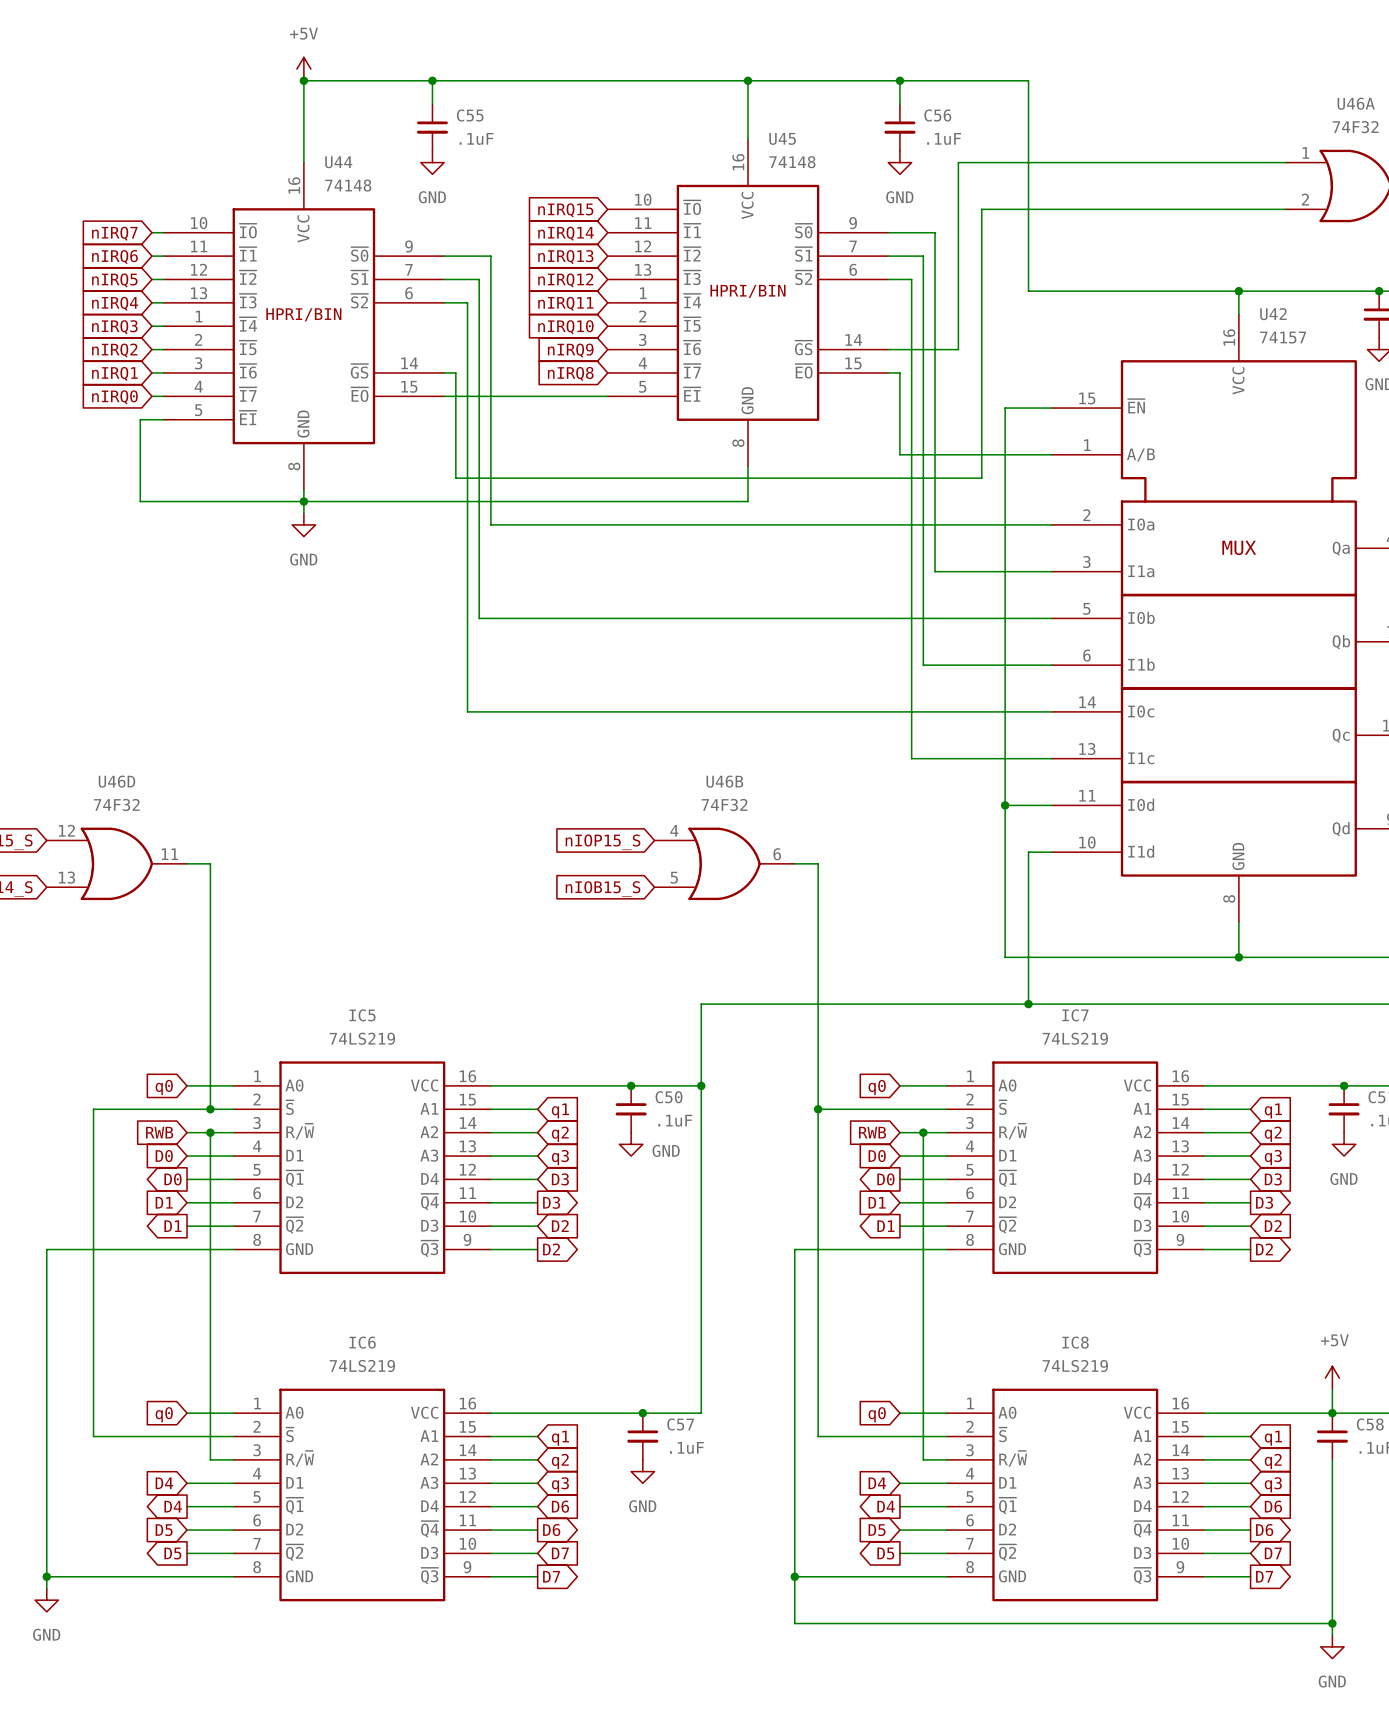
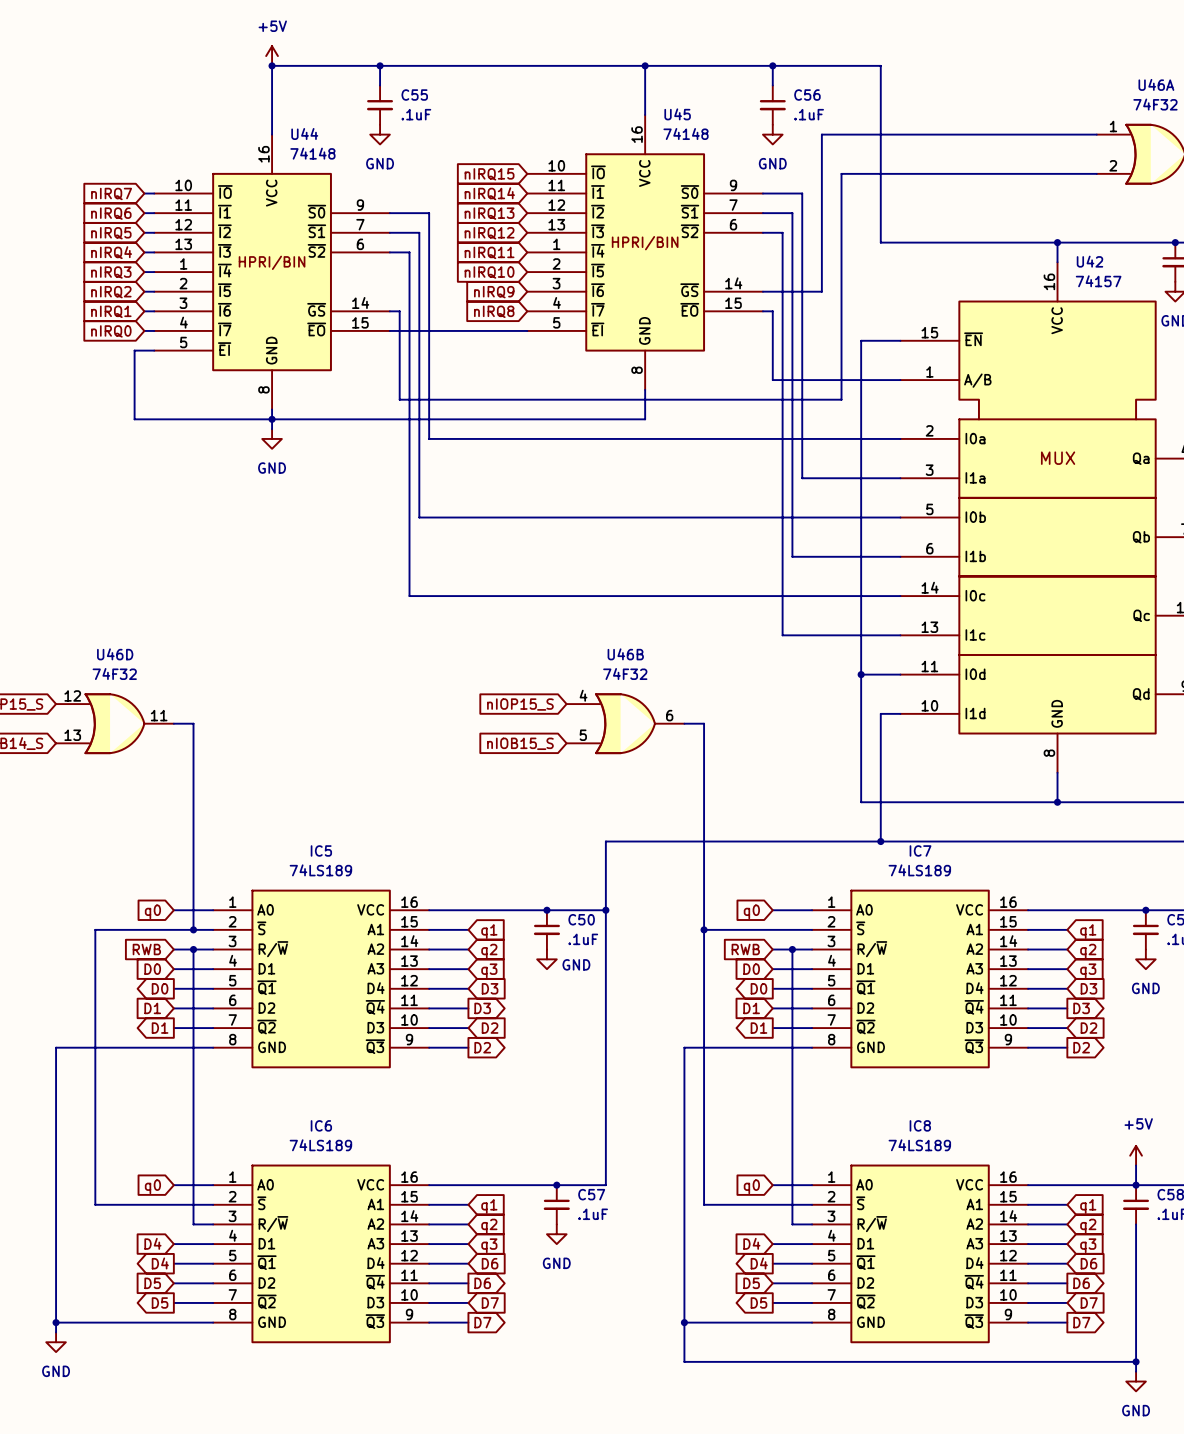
IC5 value: 74LS219 (362, 1038) -> 74LS189 (320, 870)
IC7 value: 74LS219 (1075, 1038) -> 74LS189 (919, 870)
IC6 value: 74LS219 (362, 1365) -> 74LS189 (320, 1145)
IC8 value: 74LS219 (1075, 1365) -> 74LS189 (919, 1145)

